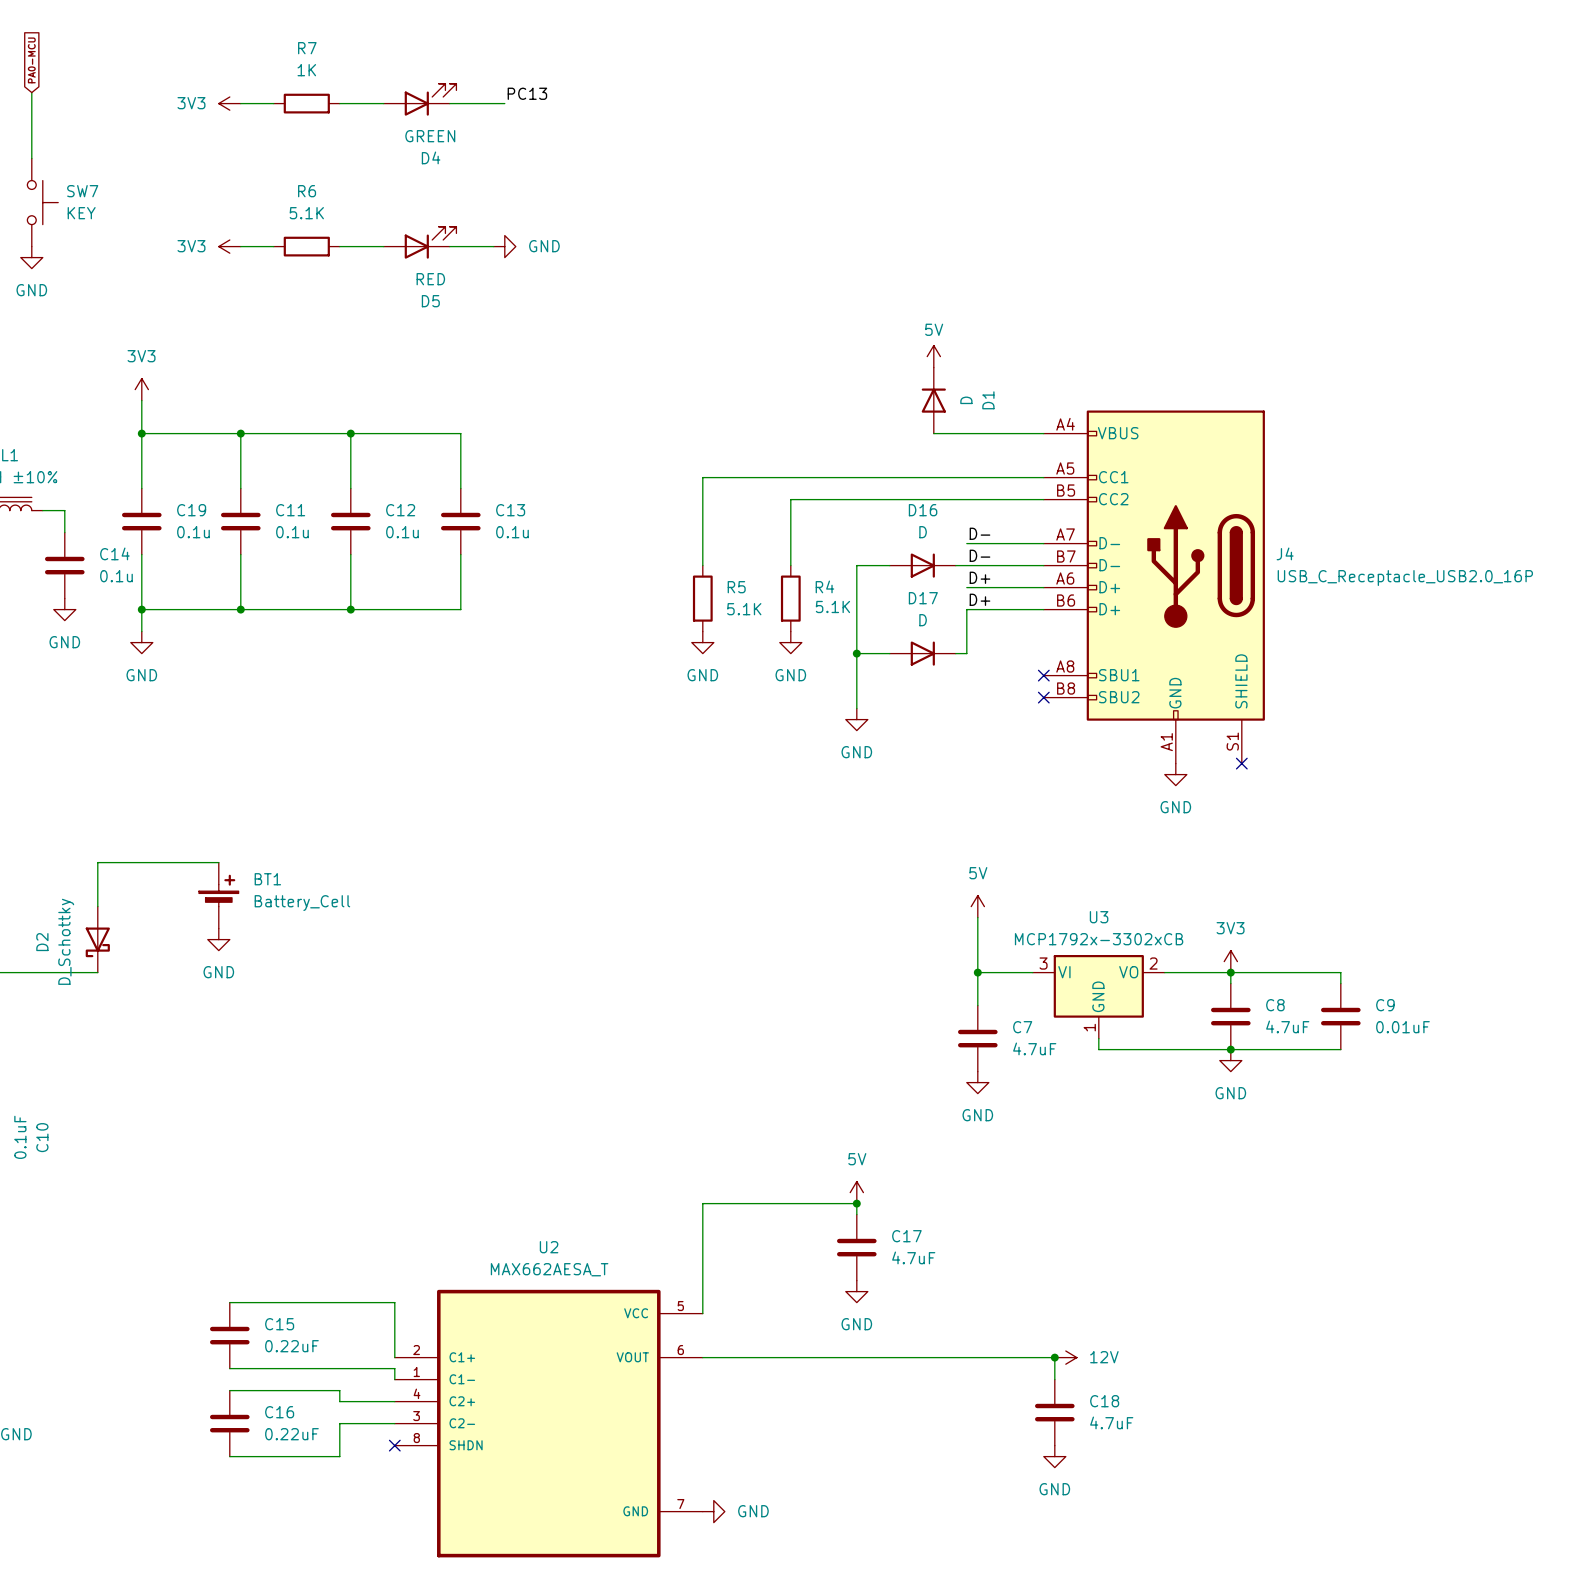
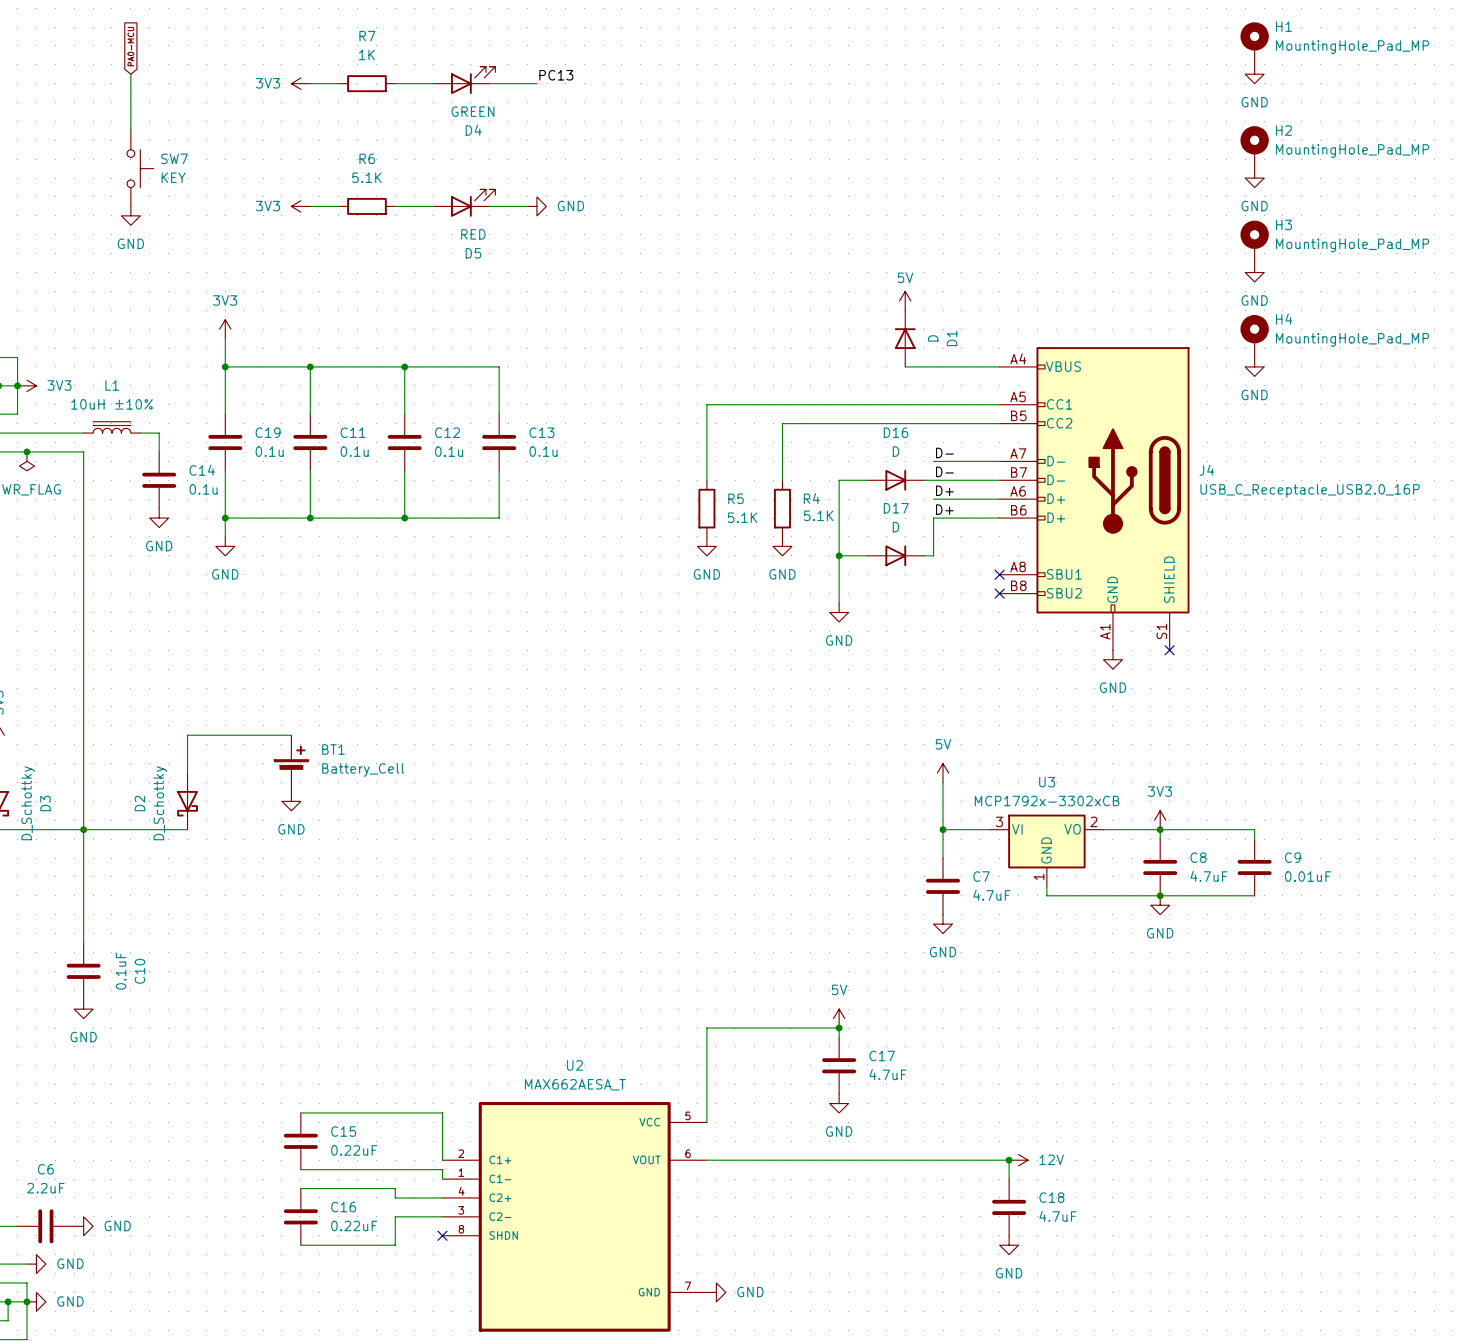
H1: none -> MountingHole_Pad_MP (1254, 43)
power symbol: none -> GND (1254, 74)
H2: none -> MountingHole_Pad_MP (1254, 147)
power symbol: none -> GND (1254, 178)
H3: none -> MountingHole_Pad_MP (1254, 241)
power symbol: none -> GND (1254, 272)
H4: none -> MountingHole_Pad_MP (1254, 336)
power symbol: none -> GND (1254, 366)

